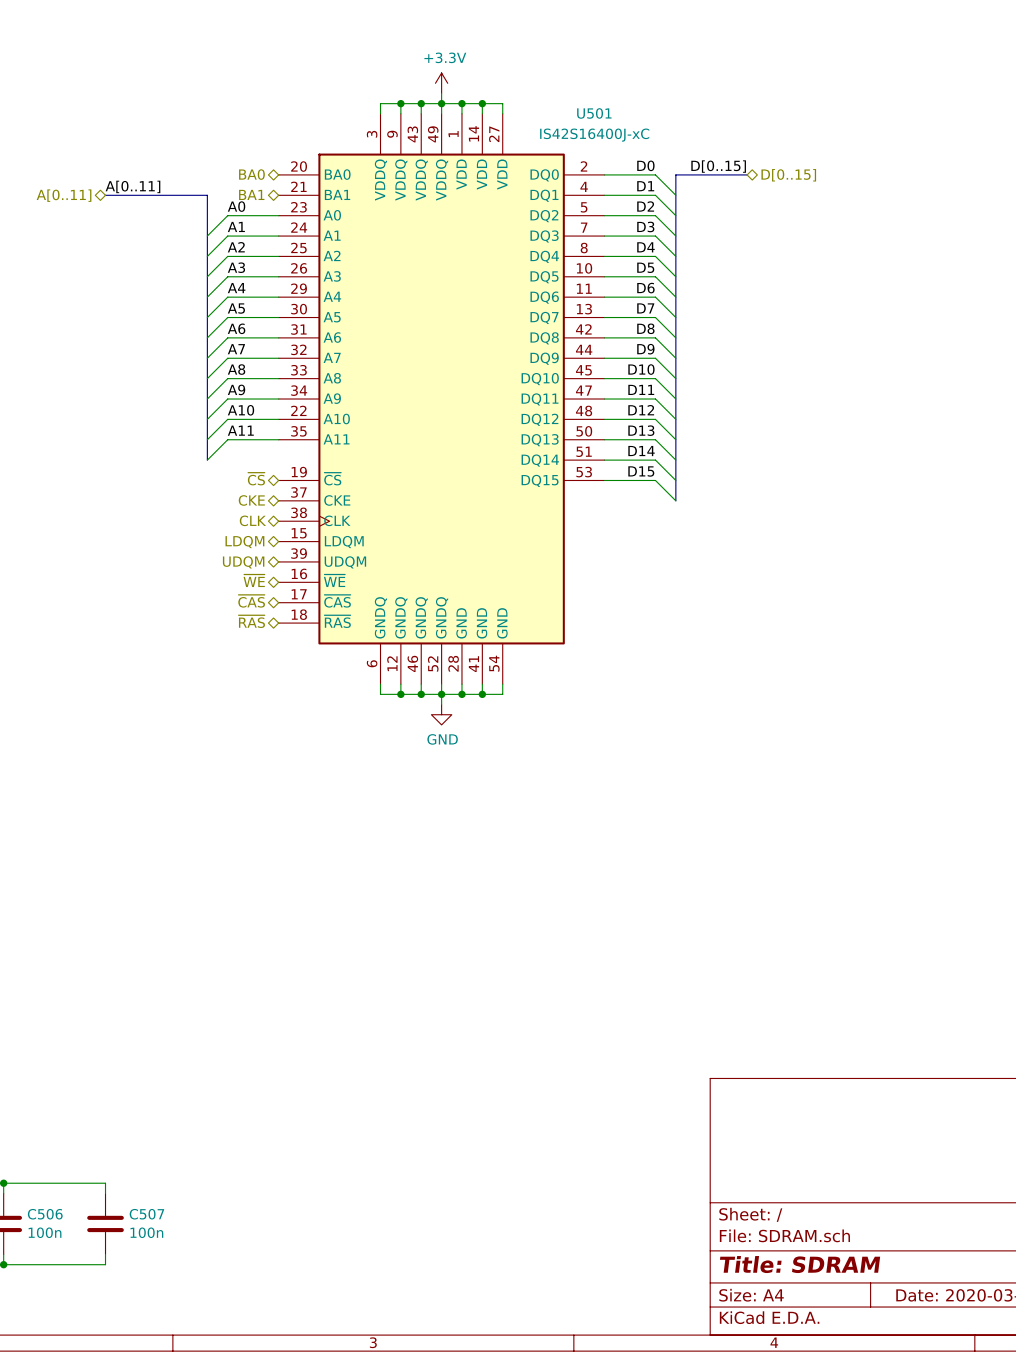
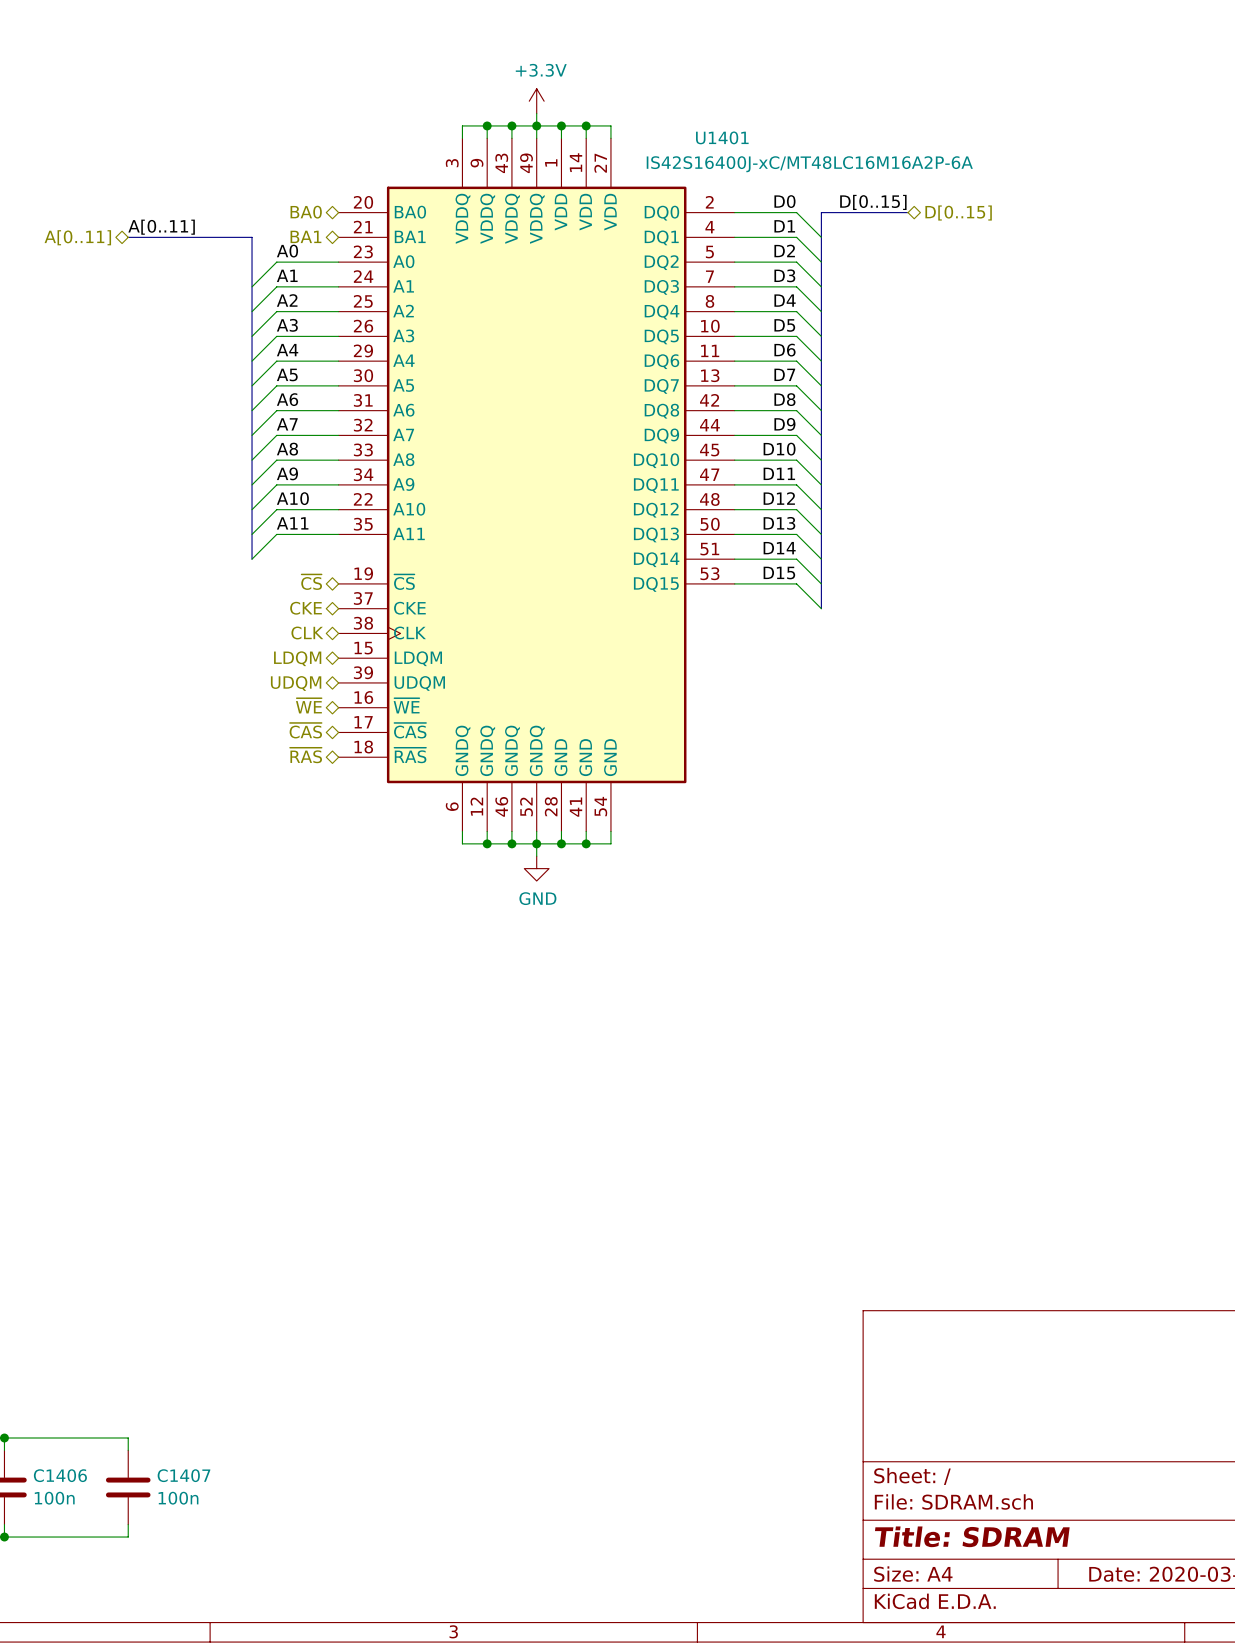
U501 name: U501 (594, 113) -> U1401 (722, 137)
U501 value: IS42S16400J-xC (594, 135) -> IS42S16400J-xC/MT48LC16M16A2P-6A (809, 164)
C506 name: C506 (45, 1214) -> C1406 (60, 1475)
C507 name: C507 (146, 1214) -> C1407 (183, 1475)

